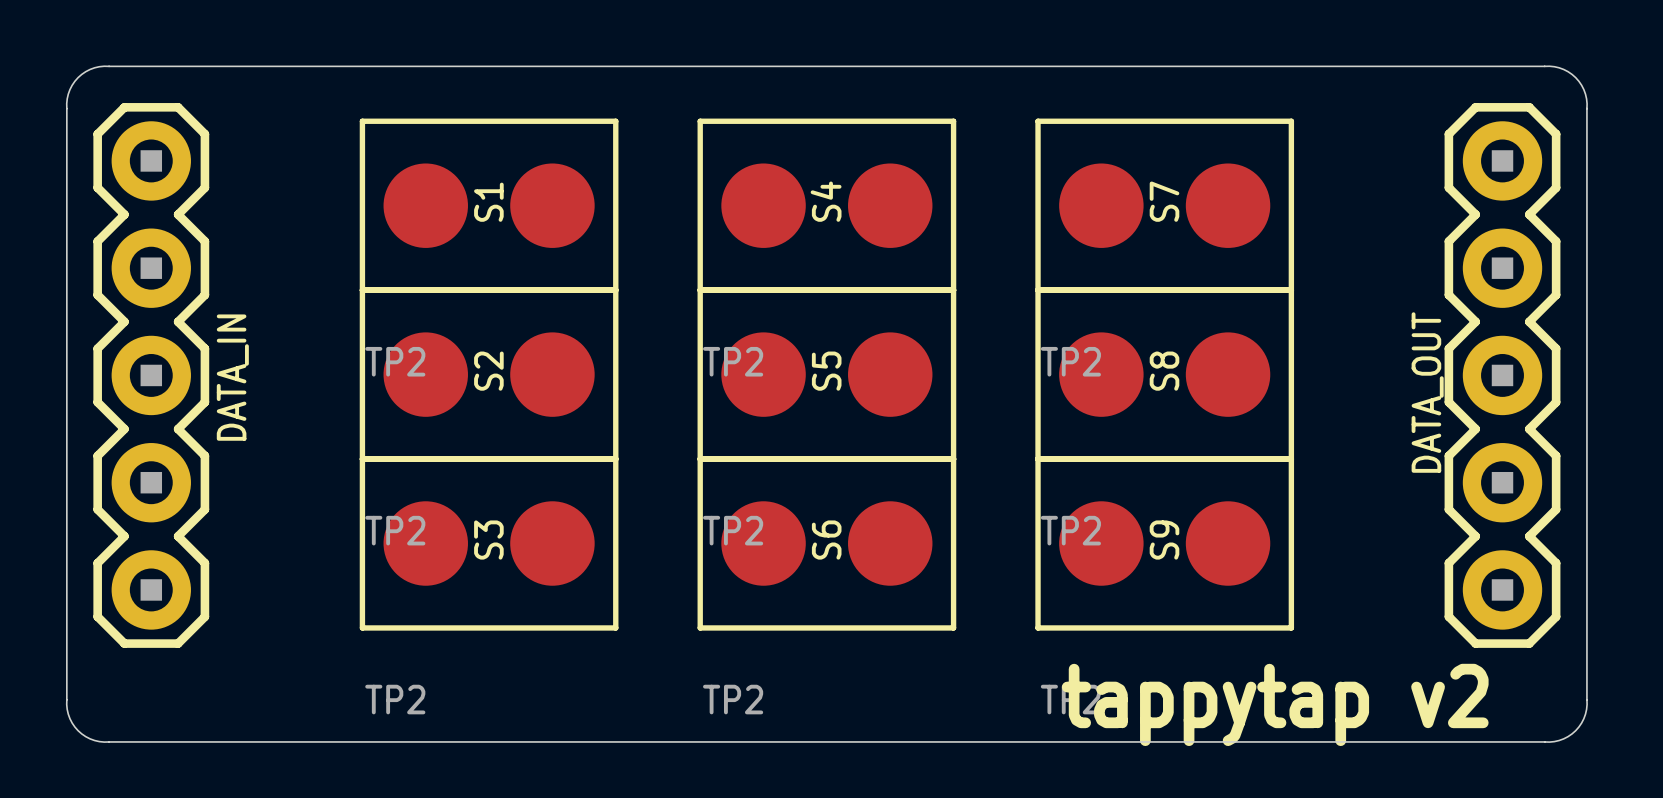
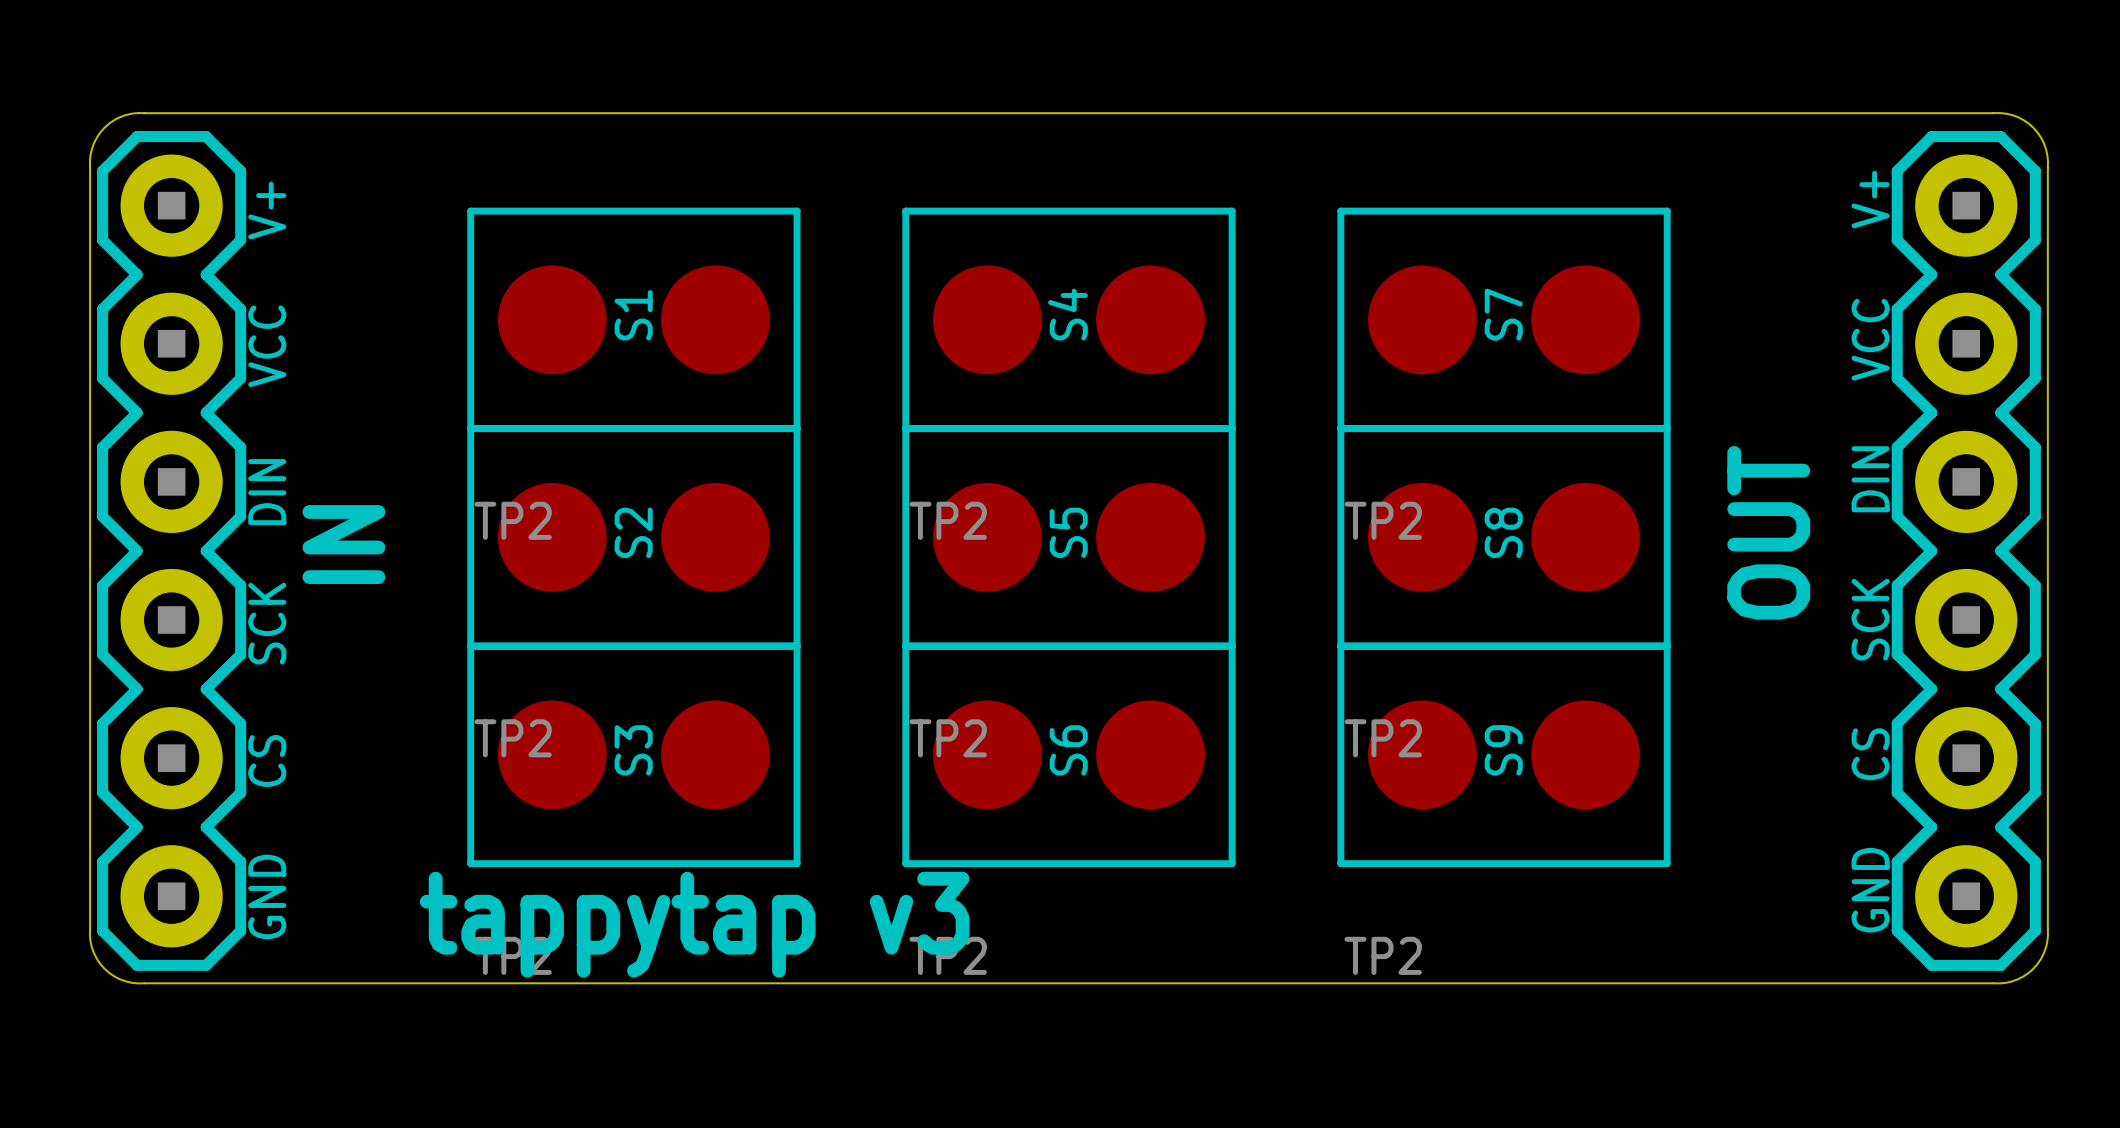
board edge: (66, 108) (69, 89) (78, 77) (90, 69) (104, 66) (1549, 66) (1563, 69) (1575, 77) (1583, 89) (1586, 108) -> (90, 194) (90, 155) (96, 137) (104, 127) (114, 120) (125, 115) (138, 113) (1999, 113) (2012, 115) (2023, 120) (2033, 127) (2040, 137) (2047, 155) (2047, 194)
text: none -> V+ (1870, 199)
text: none -> V+ (267, 210)
text: none -> VCC (1870, 339)
text: none -> VCC (267, 346)
text: none -> DIN (1870, 479)
text: none -> DIN (267, 492)
DATA_IN: (151, 375) -> none
DATA_OUT: (1502, 375) -> none
IN: none -> (171, 550)
OUT: none -> (1966, 550)
text: none -> SCK (1870, 619)
text: none -> SCK (267, 623)
text: none -> CS (1870, 754)
text: none -> CS (267, 760)
text: none -> GND (1870, 890)
text: none -> GND (267, 896)
text: none -> tappytap v3 (694, 924)
board edge: (66, 678) (67, 709) (72, 723) (85, 736) (104, 742) (1549, 742) (1568, 736) (1581, 723) (1586, 709) (1586, 678) -> (90, 928) (90, 941) (94, 953) (104, 968) (119, 979) (138, 983) (1999, 983) (2017, 979) (2033, 968) (2043, 953) (2047, 941) (2047, 928)
text: tappytap v2 (1275, 704) -> none

